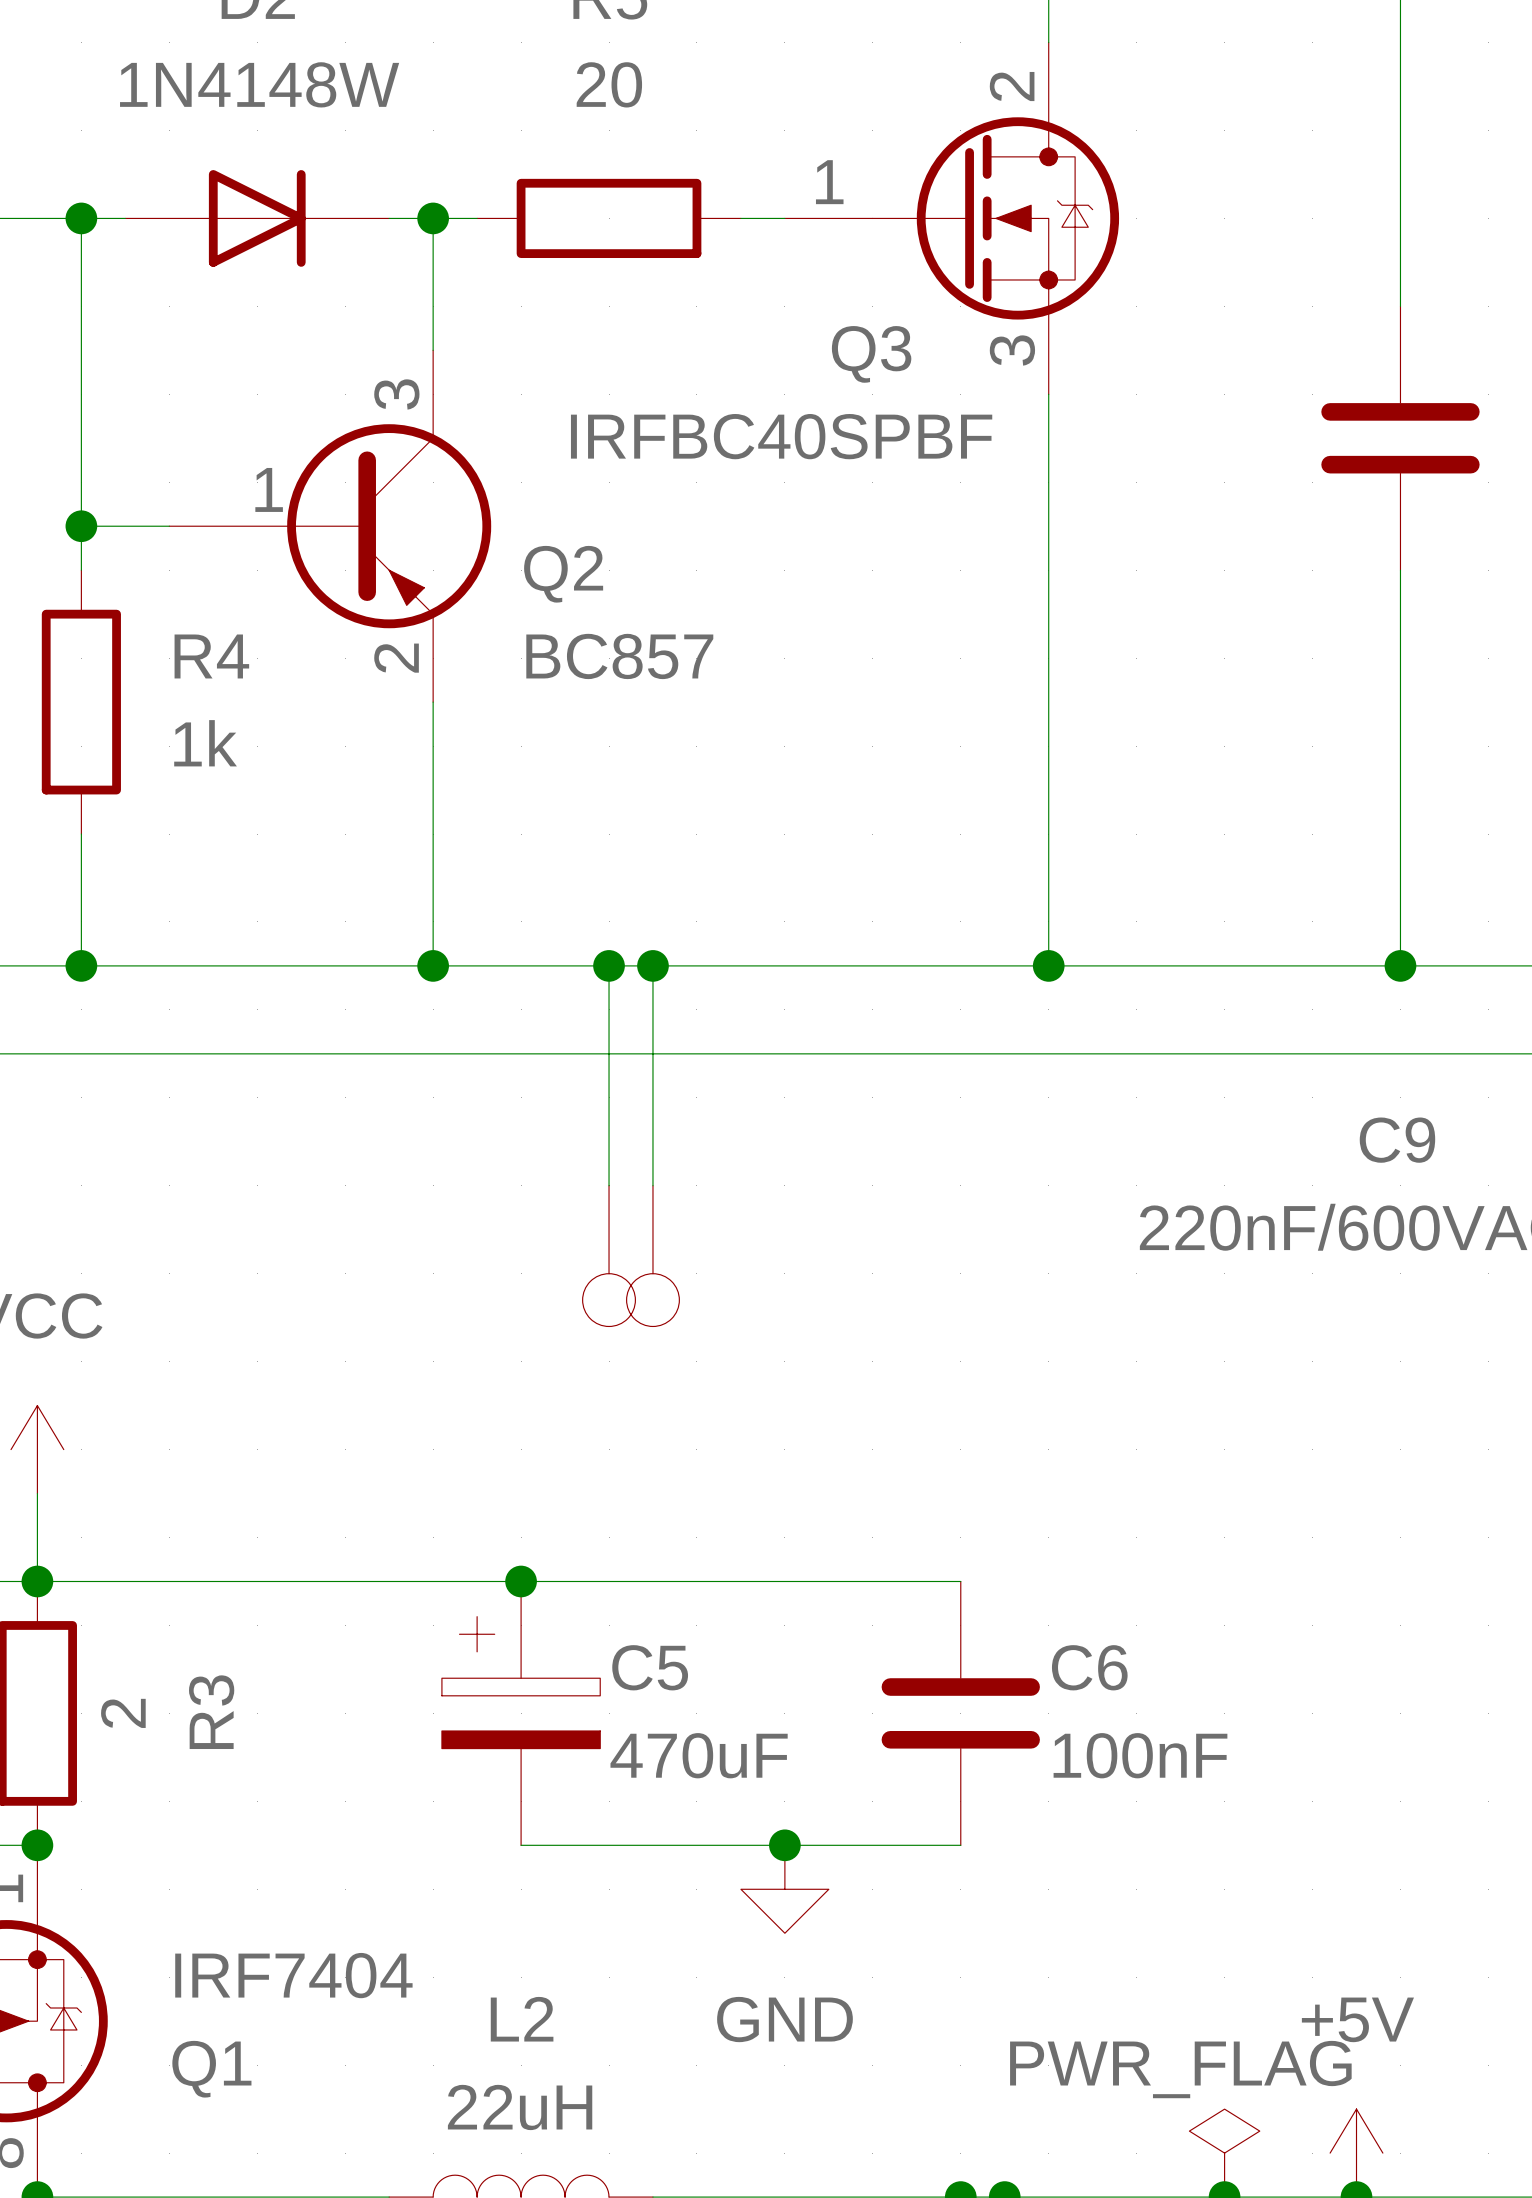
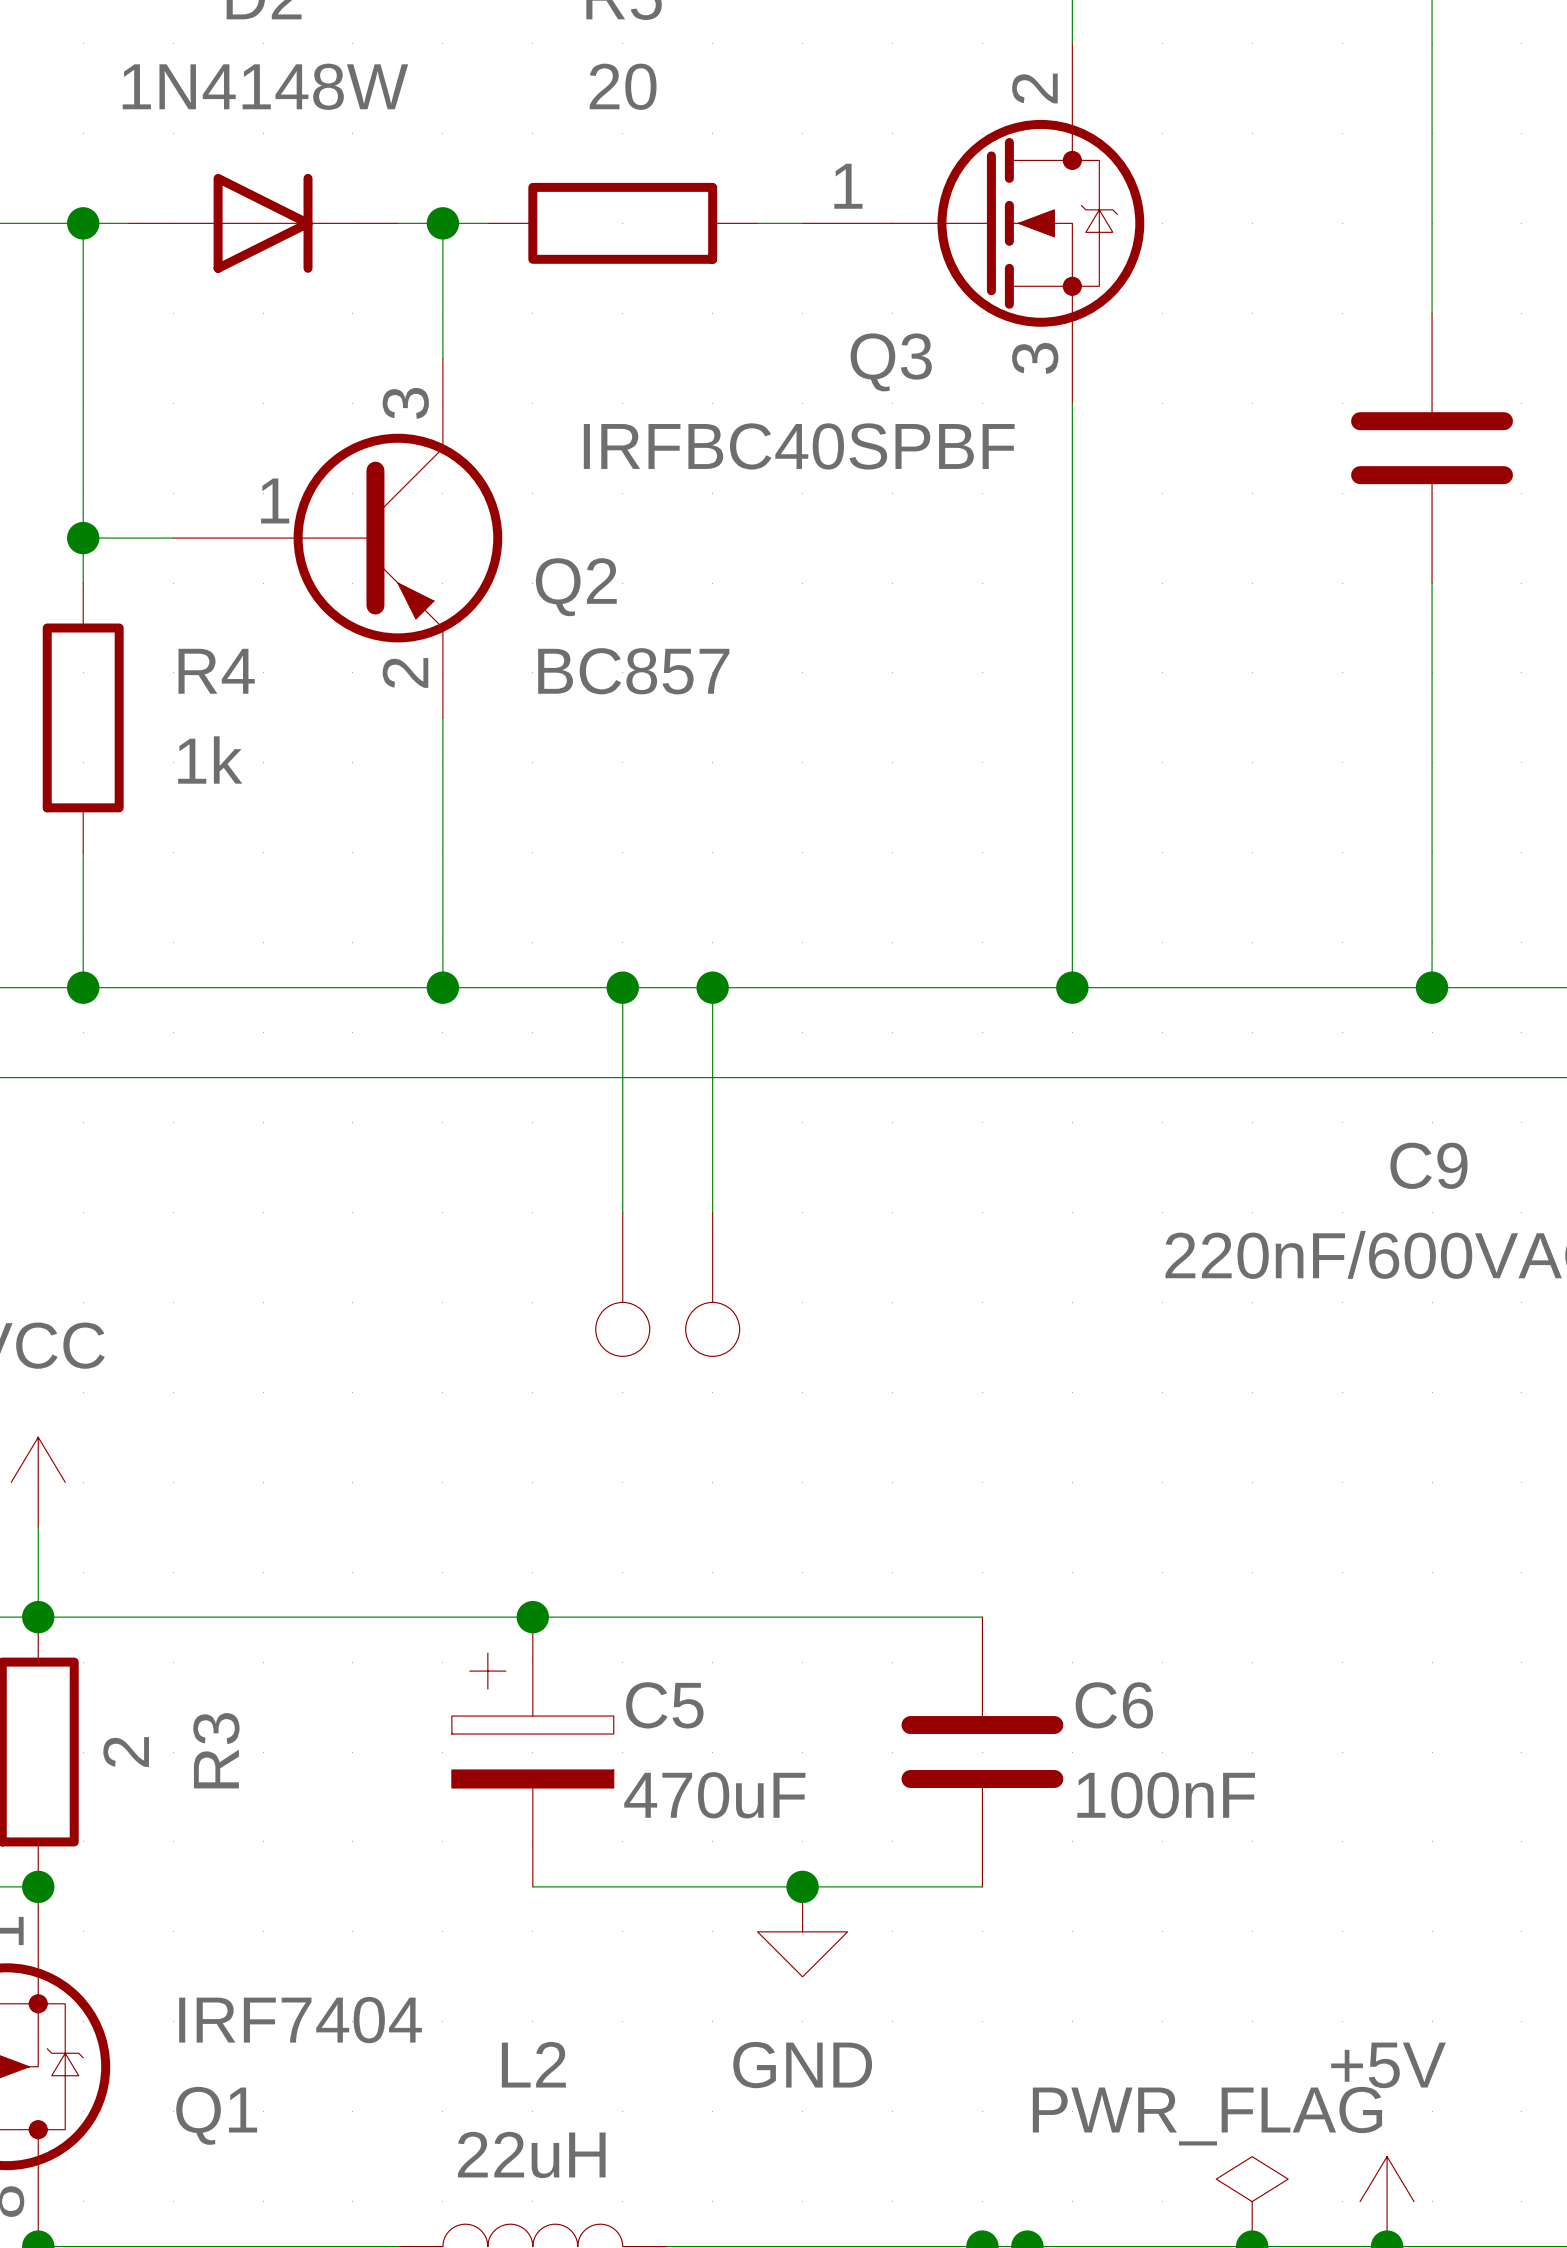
wire: (652, 965) (652, 1185) -> (712, 987) (712, 1212)
junction position: (652, 965) -> (712, 987)
part position: (652, 1256) -> (712, 1284)

